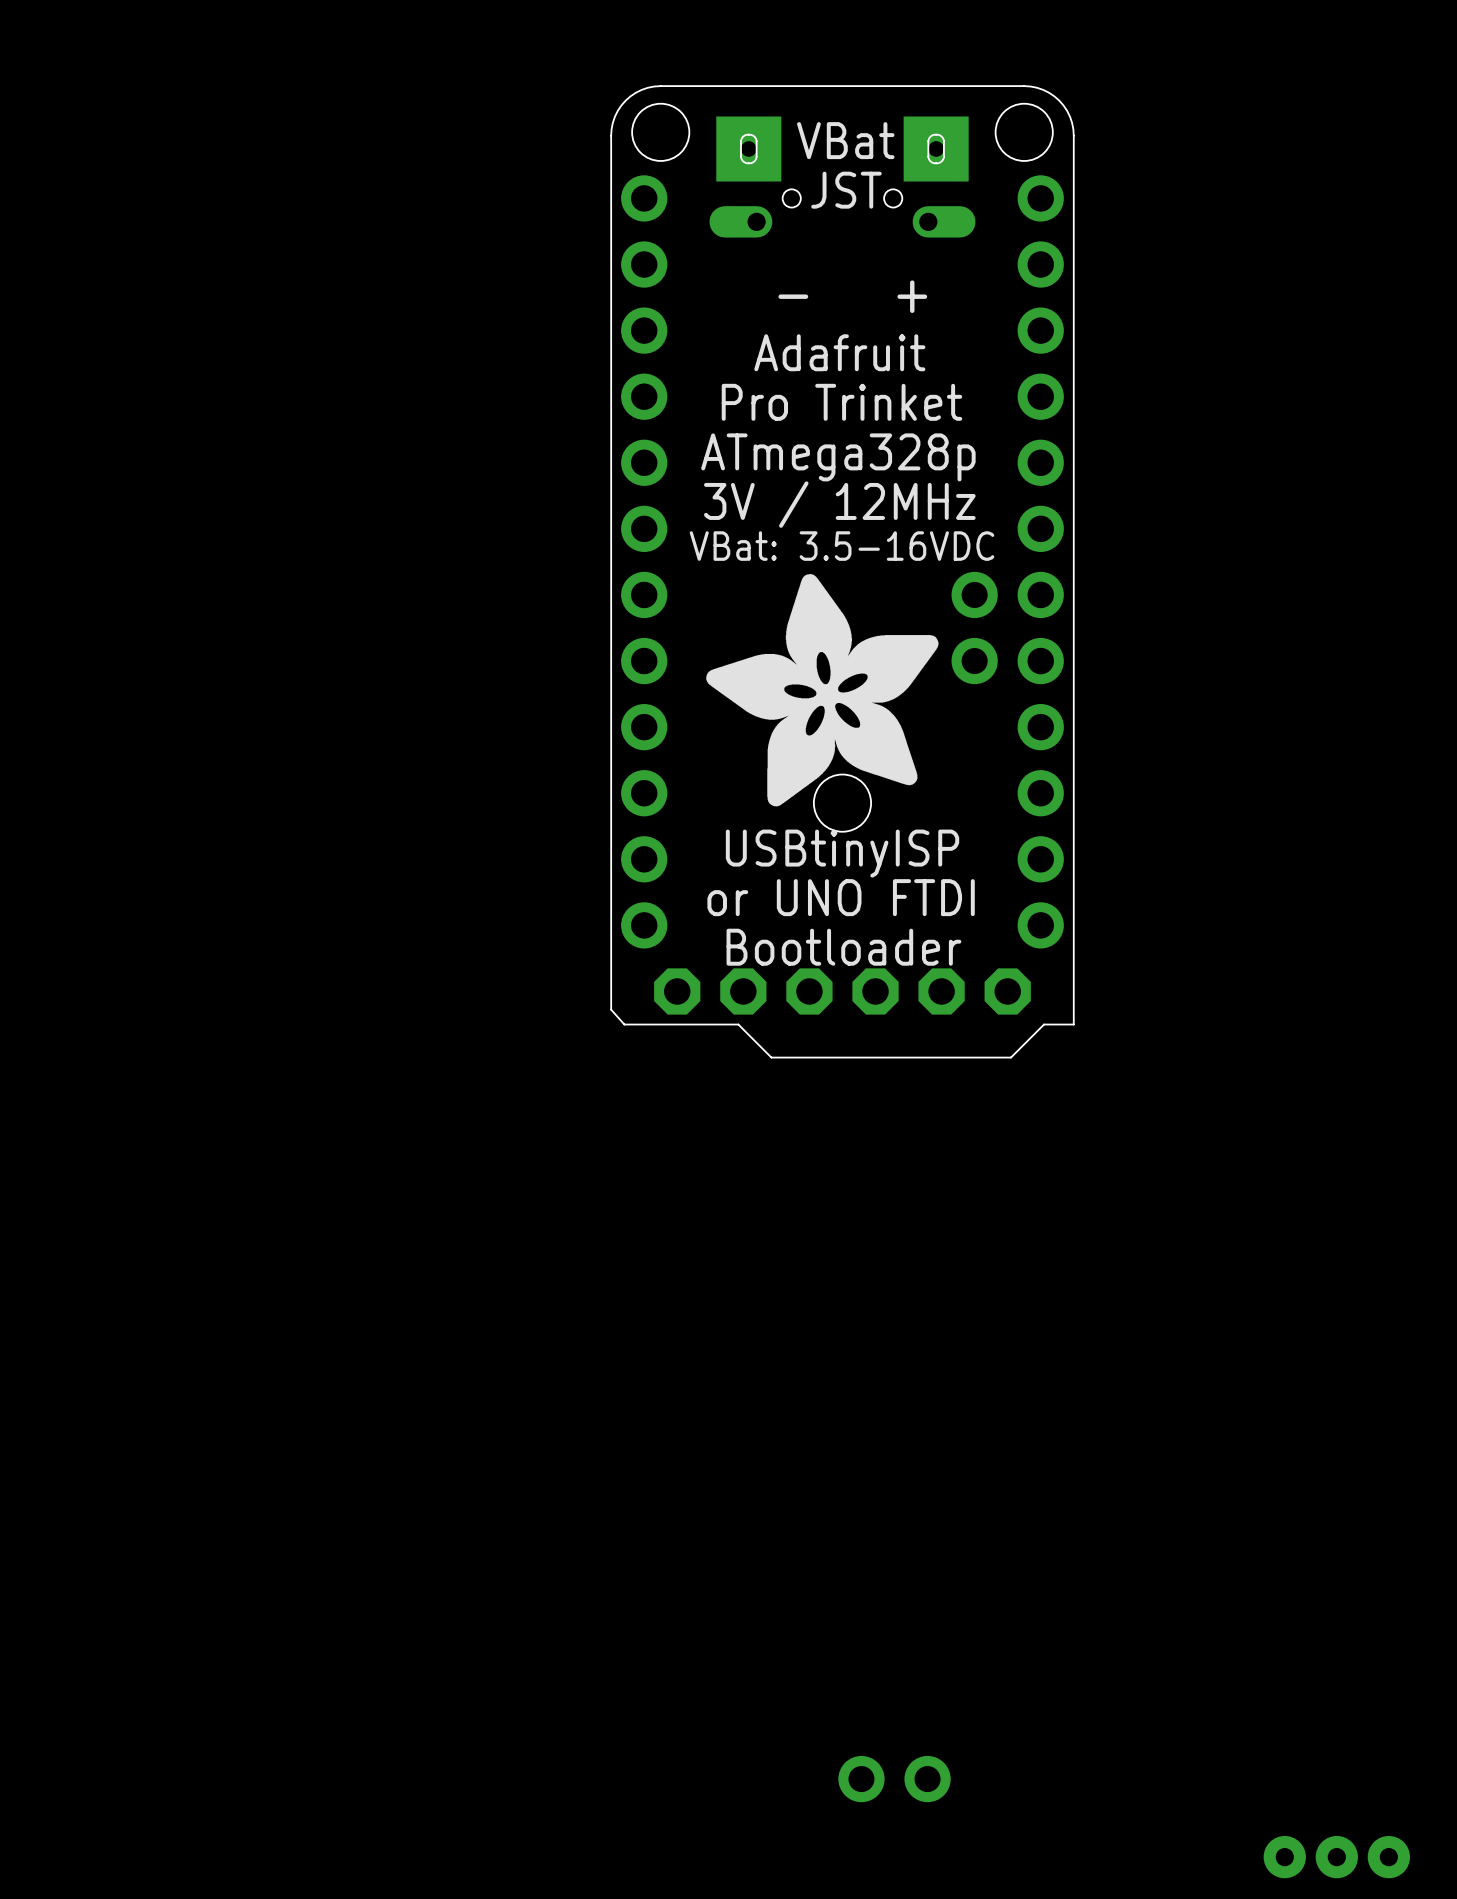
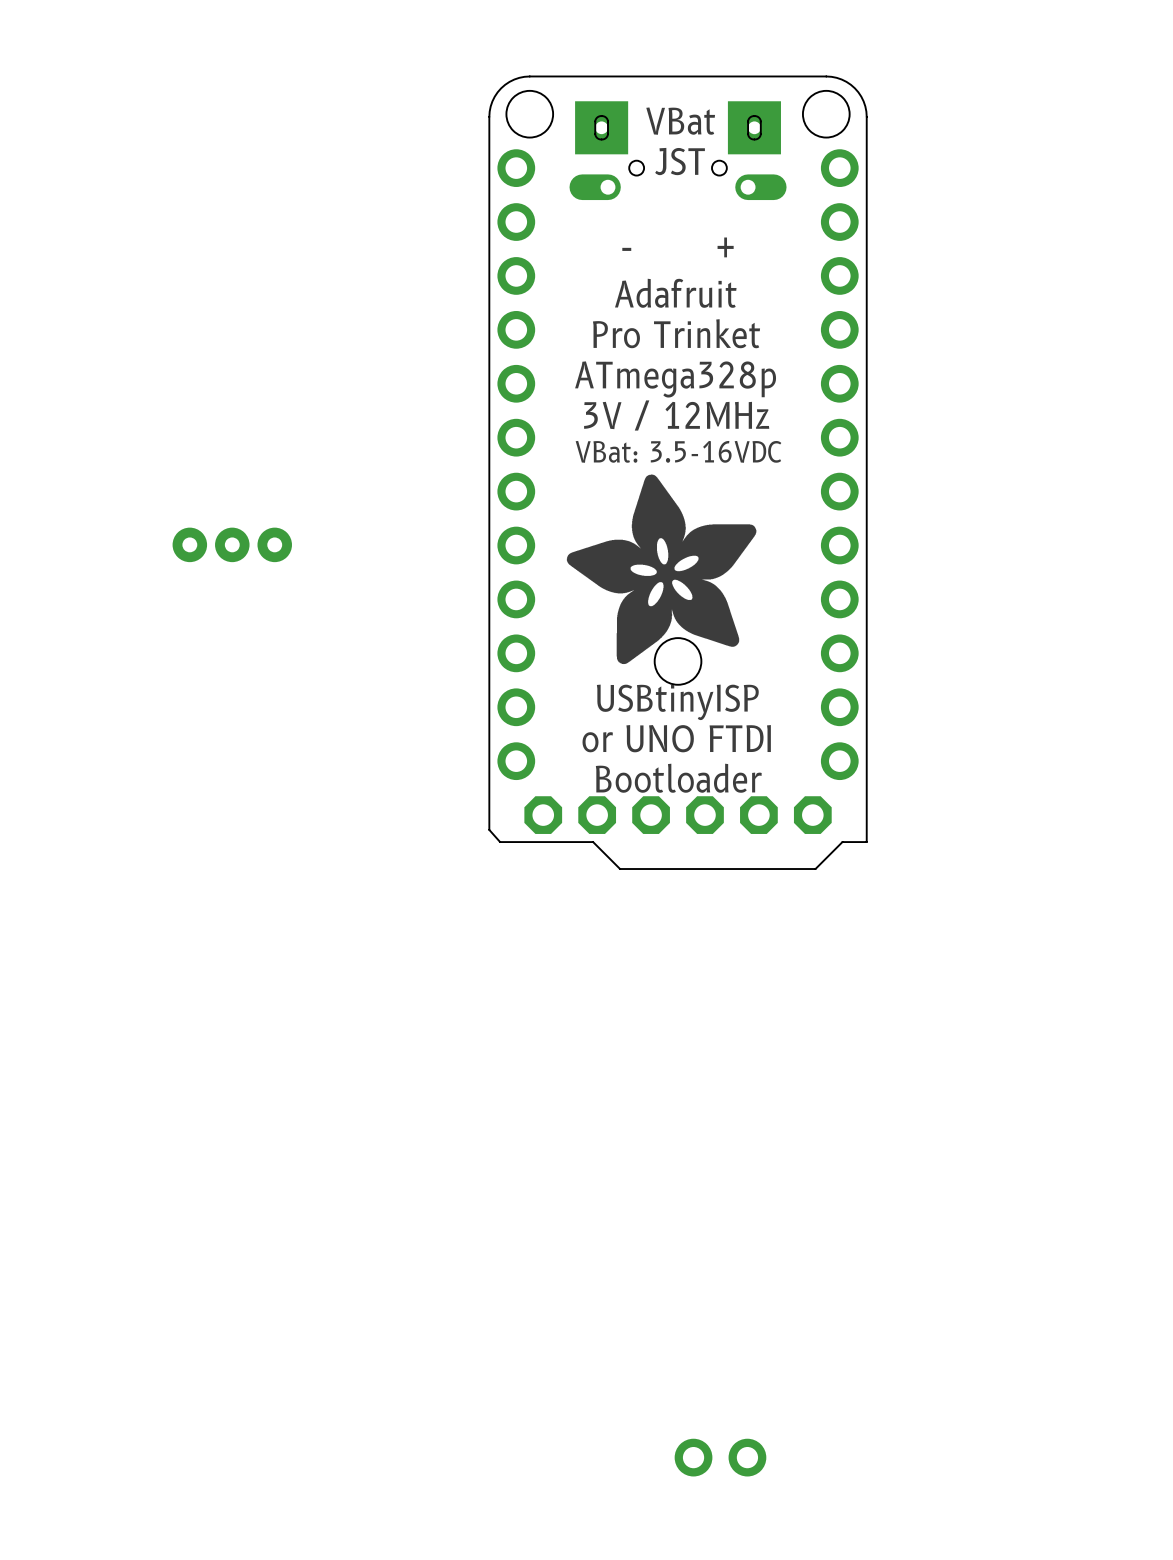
part: (974, 628) -> none
part: none -> (232, 544)
part: (1336, 1857) -> none

